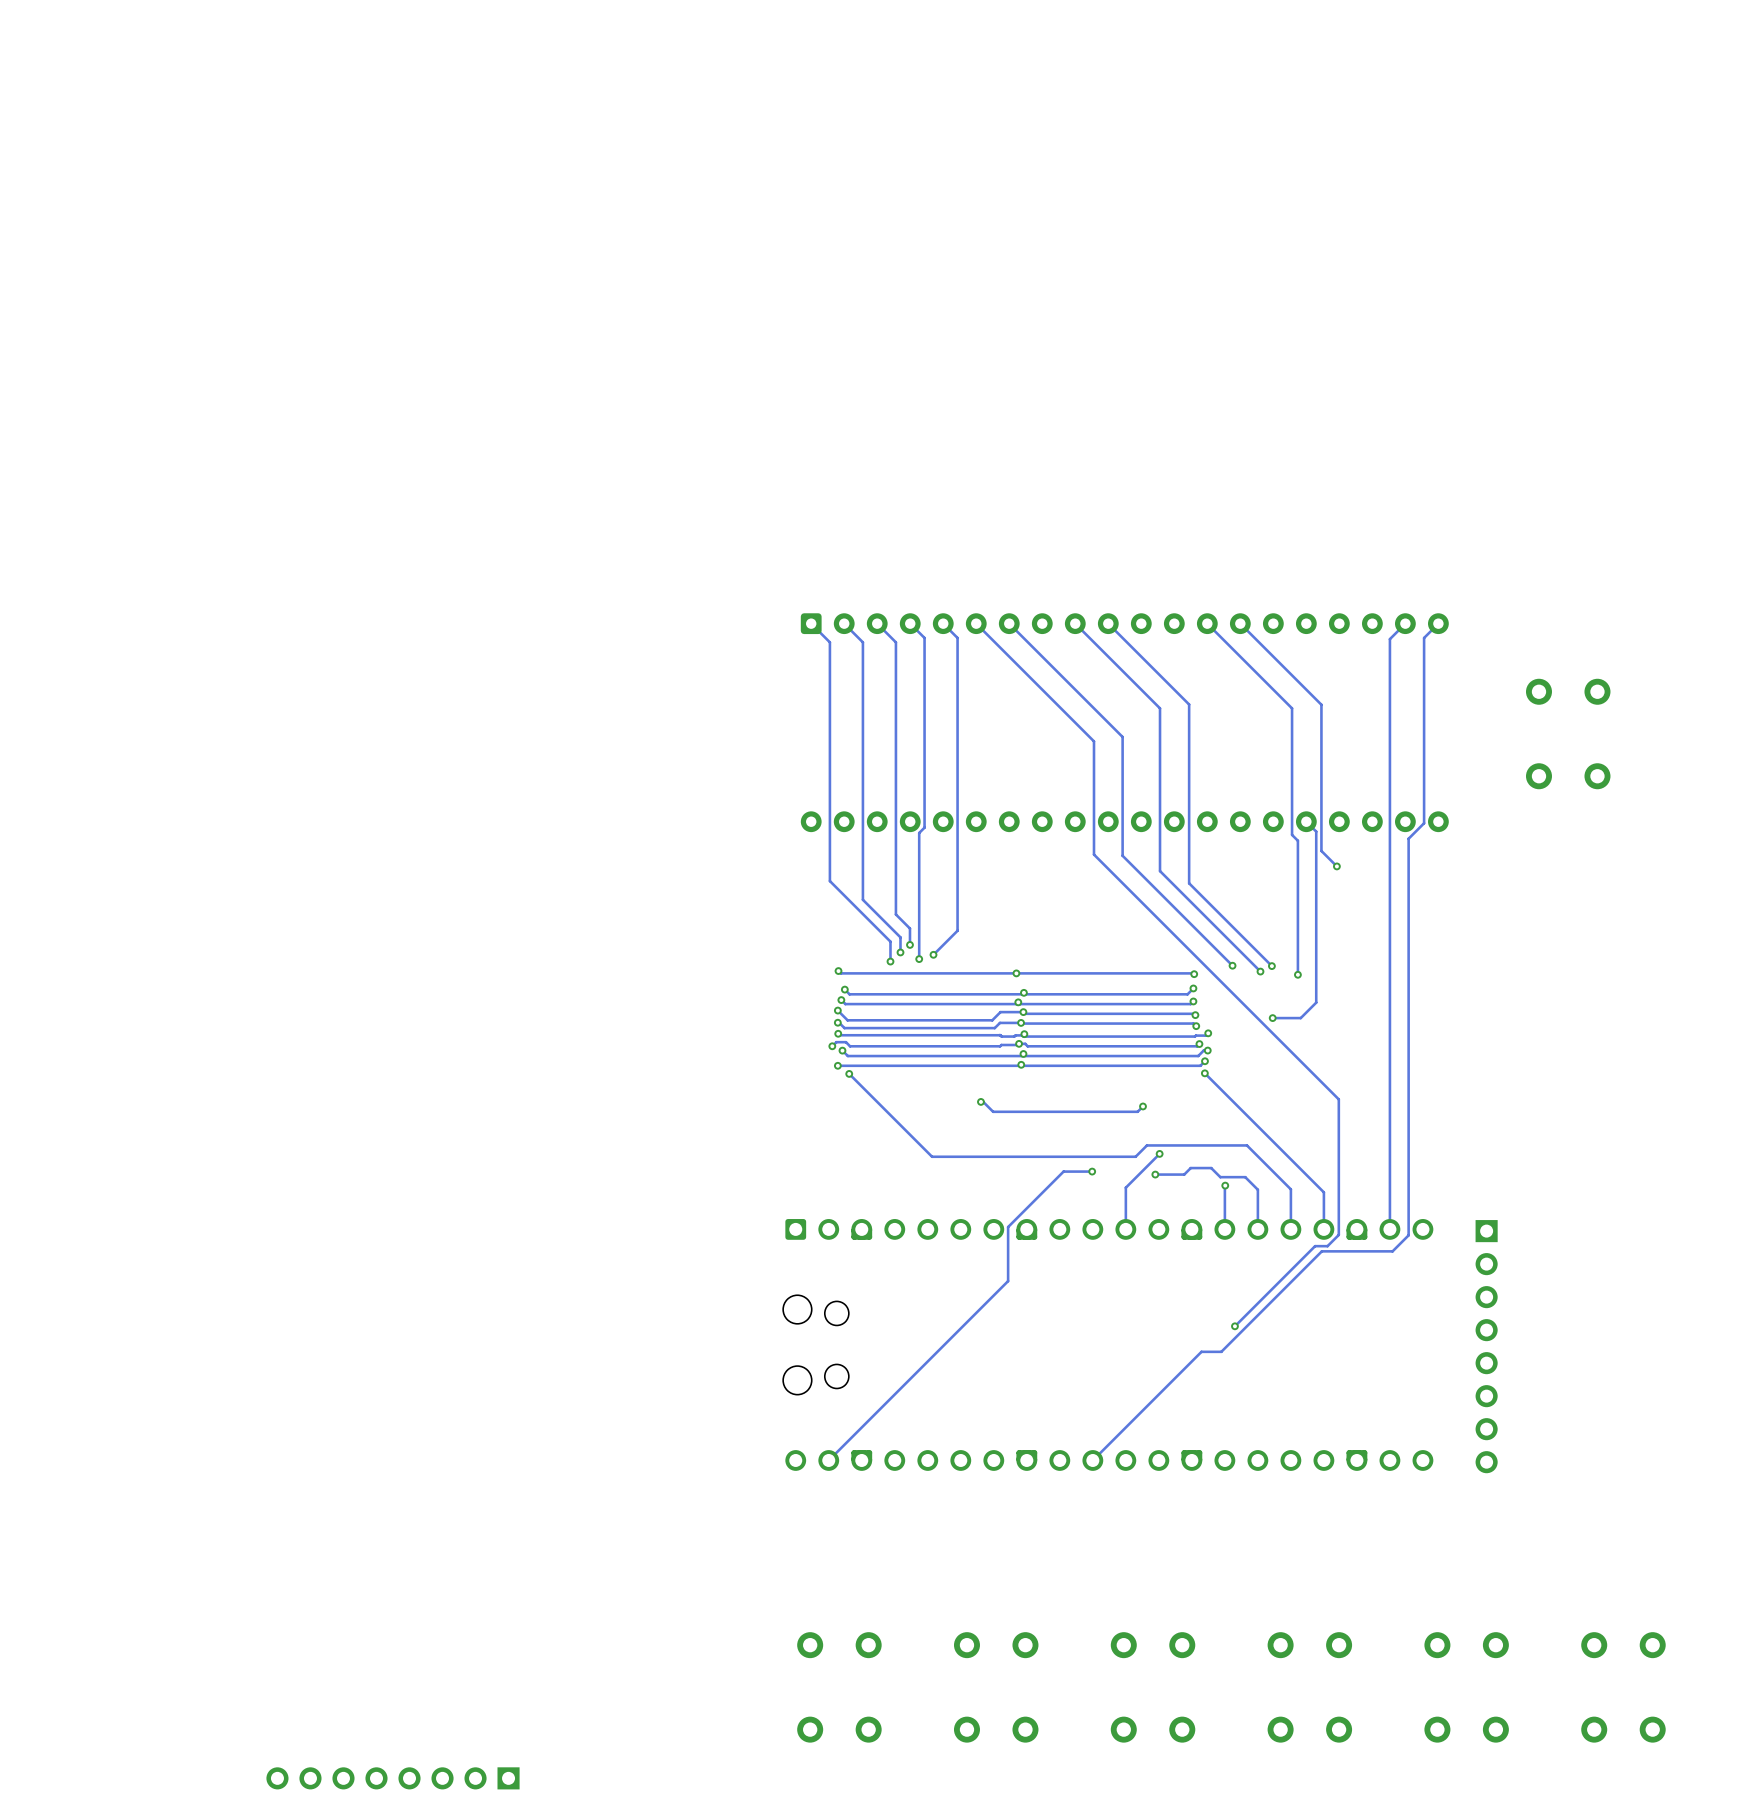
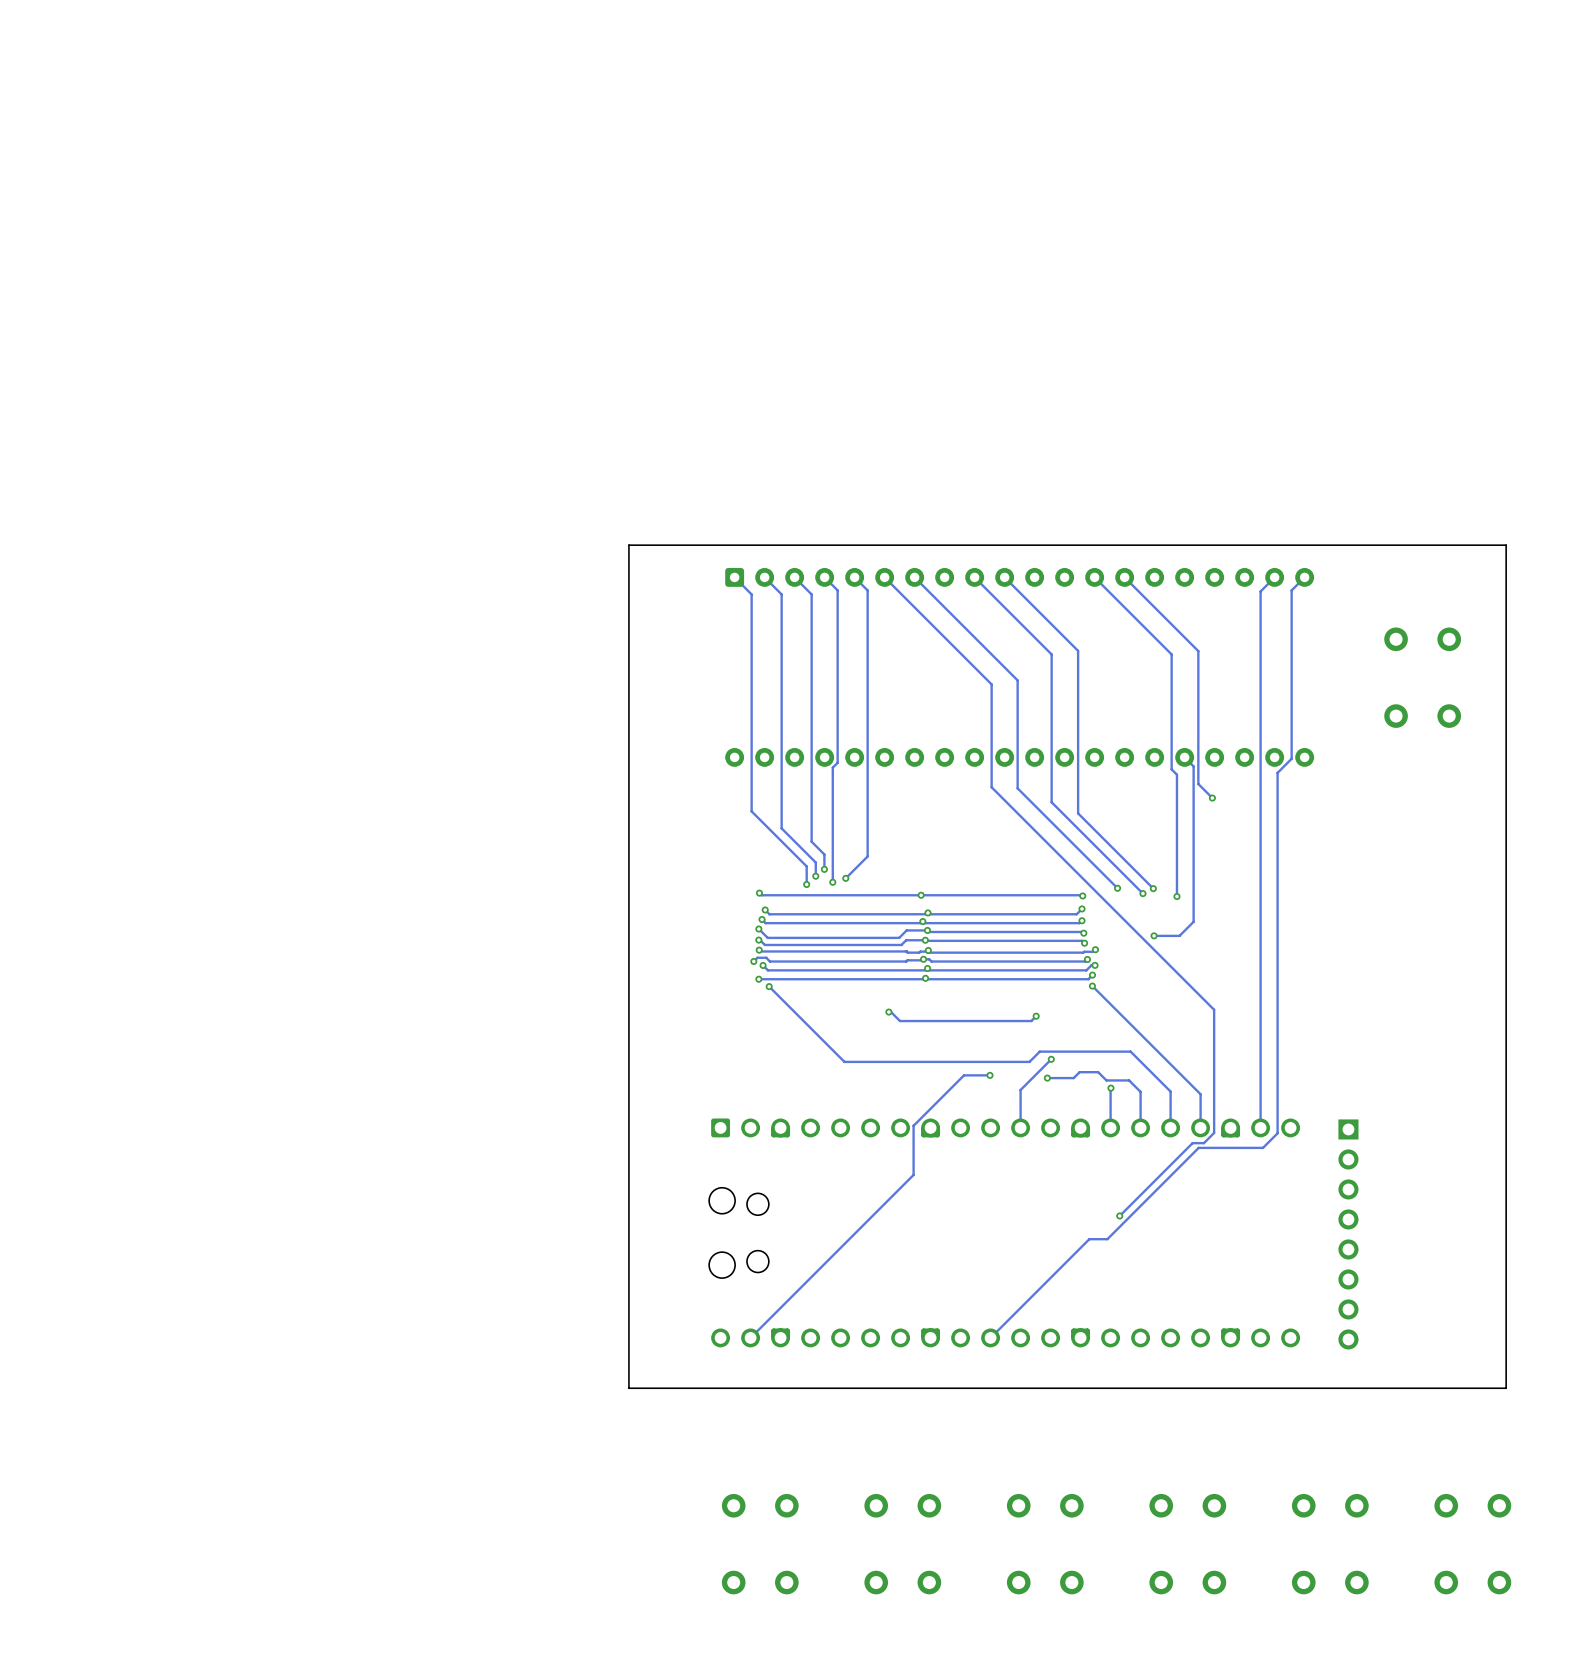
board edge: none -> (1506, 545) (628, 545) (628, 1388) (1506, 1388) (1506, 545)
part: (393, 1778) -> none

